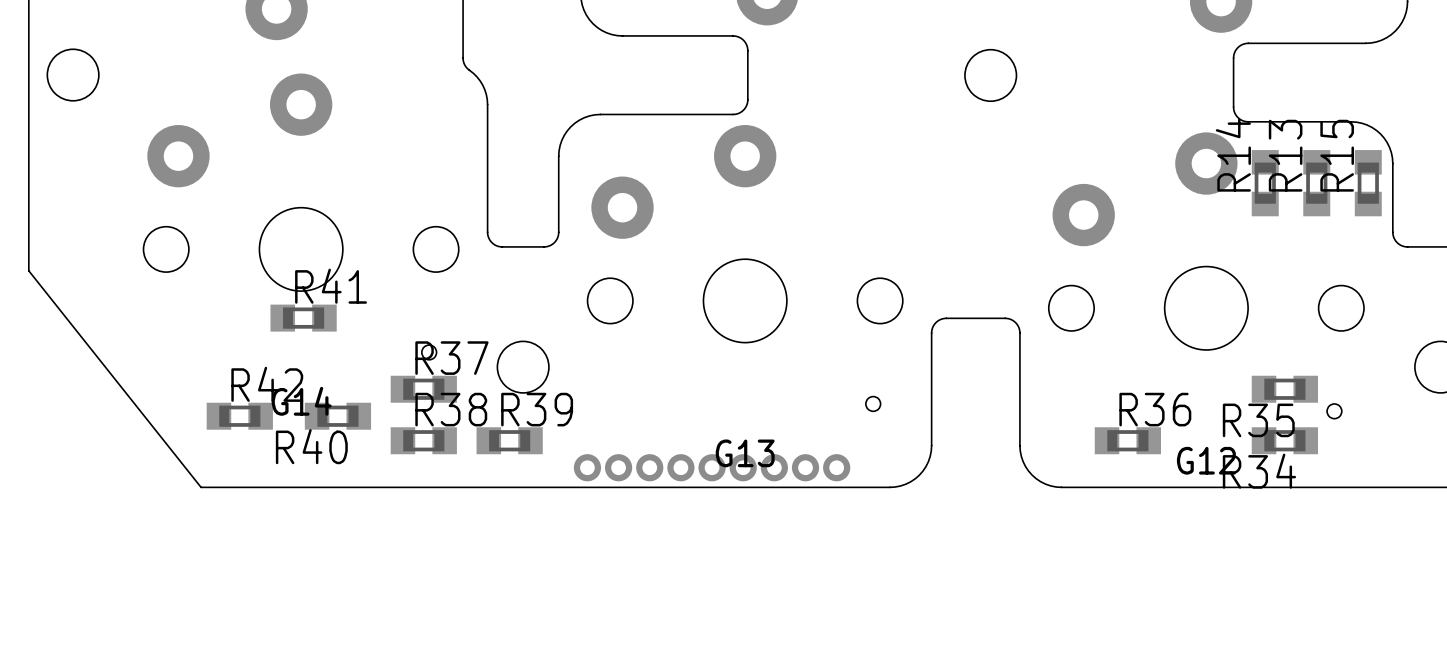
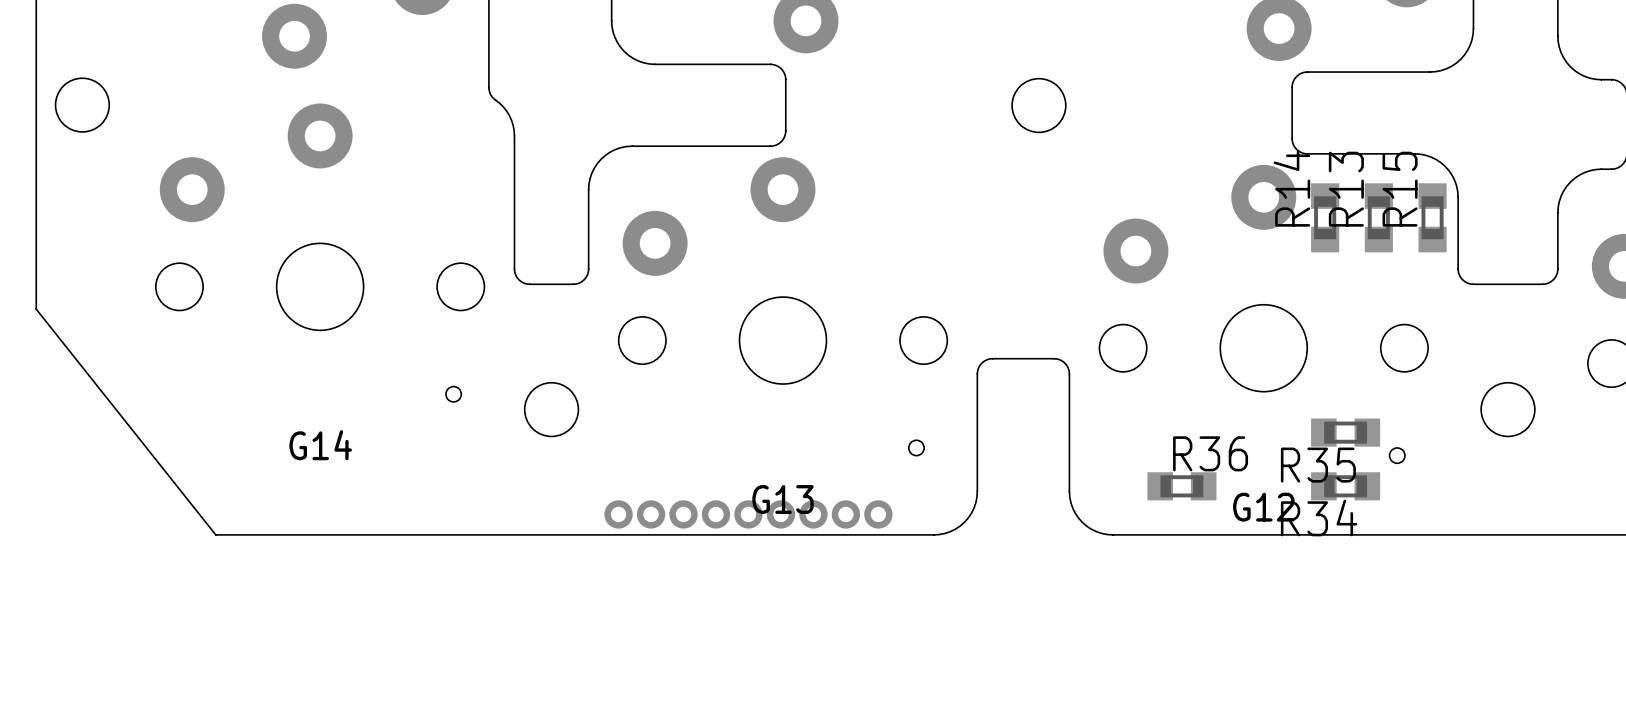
R41: (303, 318) -> none
R37: (423, 389) -> none
R42: (239, 416) -> none
R40: (337, 416) -> none
R38: (423, 440) -> none
R39: (509, 440) -> none

